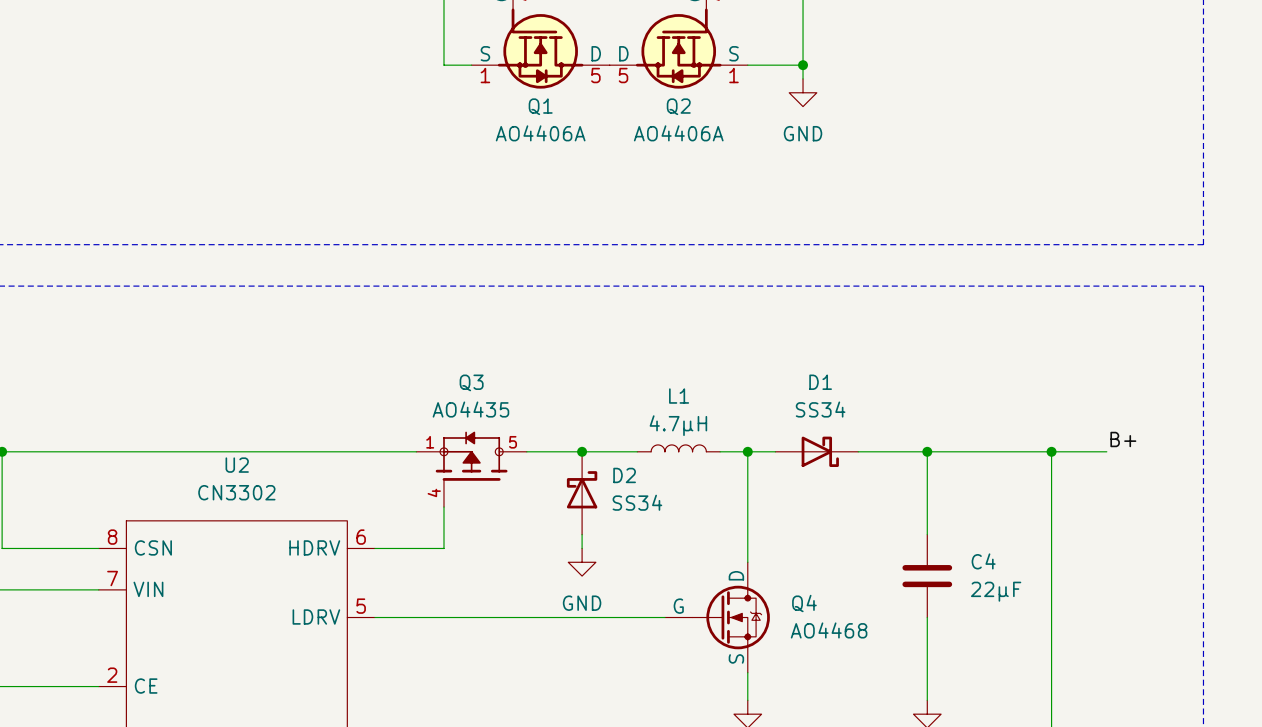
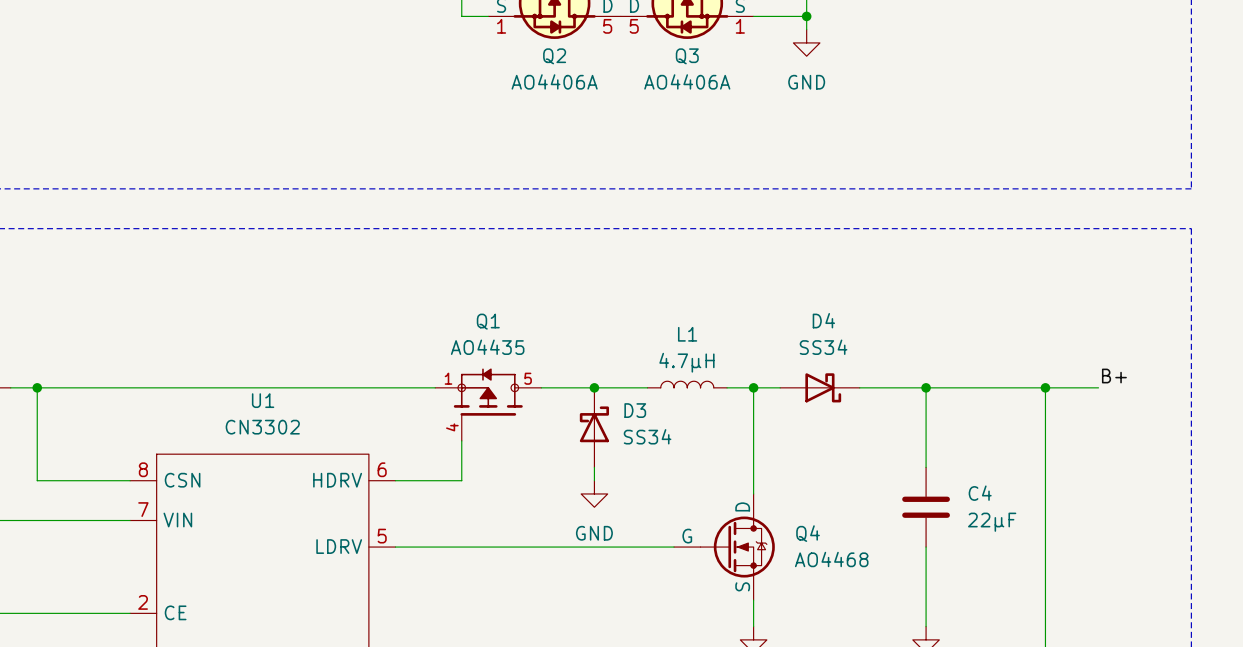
Q1 name: Q1 (540, 106) -> Q2 (554, 56)
Q2 name: Q2 (678, 106) -> Q3 (687, 56)
Q3 name: Q3 (471, 382) -> Q1 (488, 321)
D1 name: D1 (820, 382) -> D4 (823, 320)
U2 name: U2 (237, 465) -> U1 (263, 400)
D2 name: D2 (624, 475) -> D3 (635, 410)

